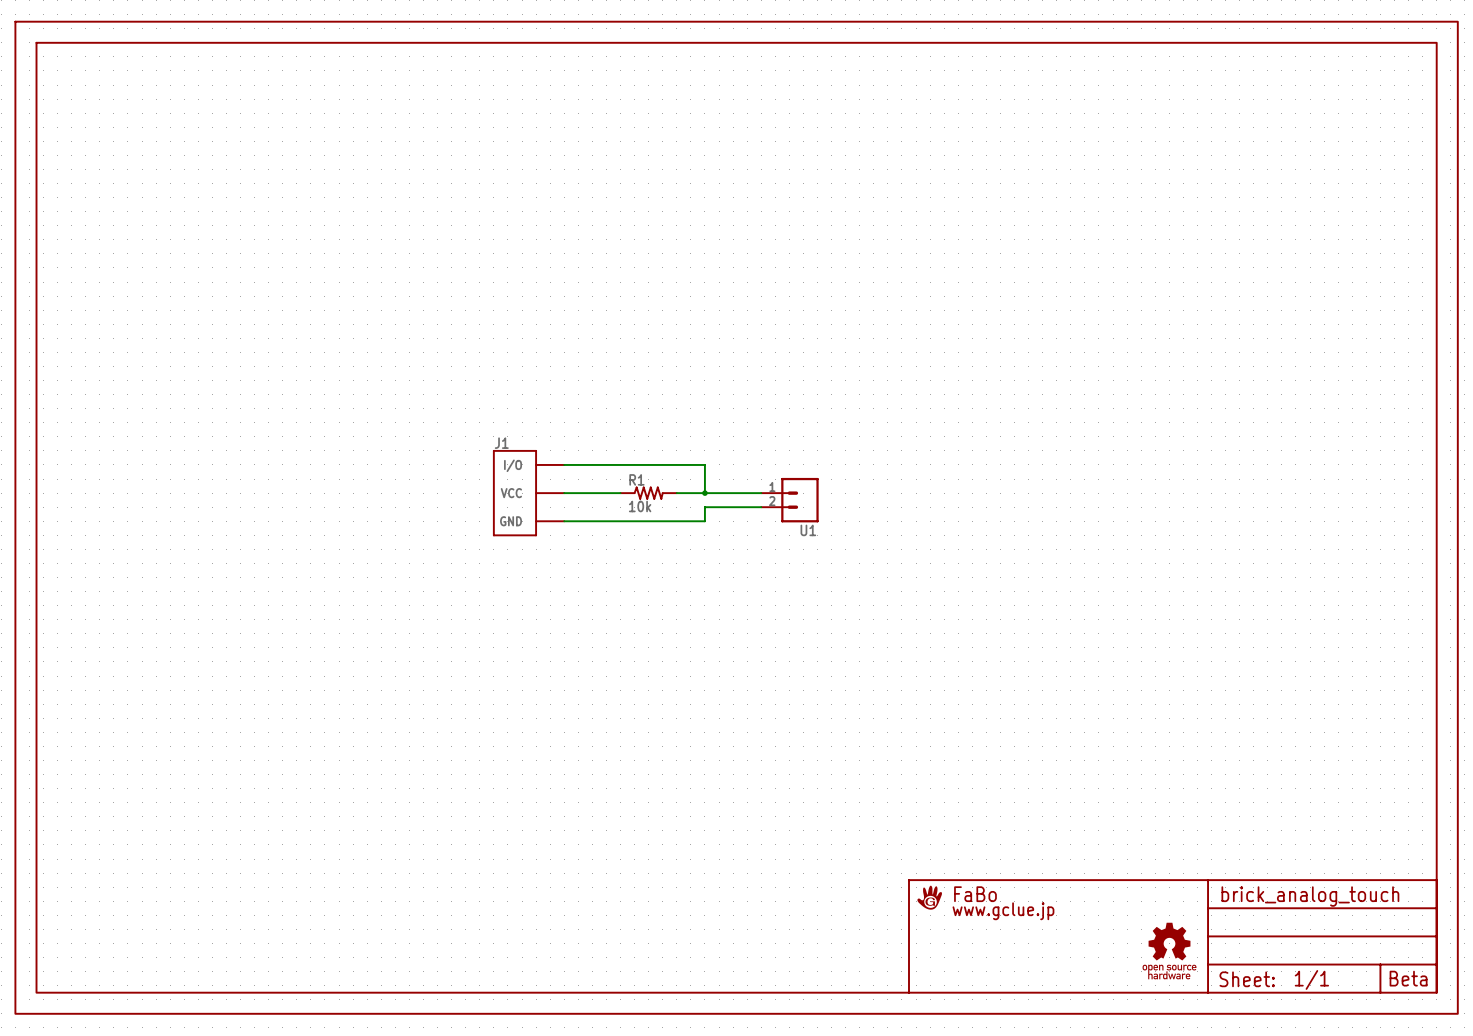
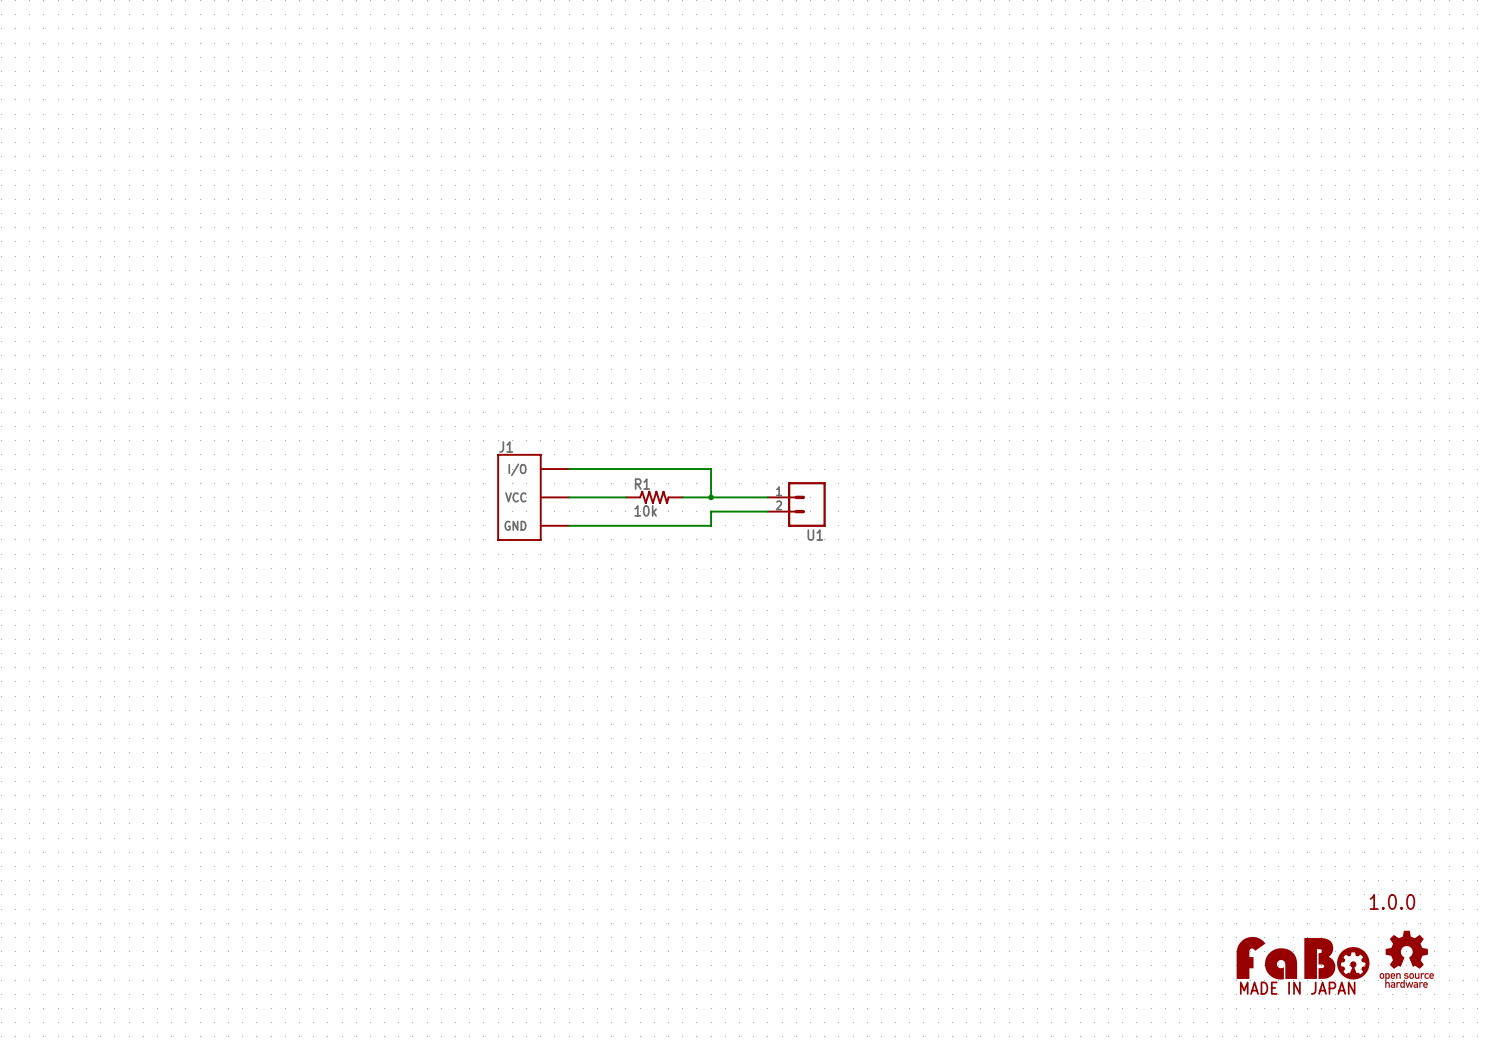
part: (736, 517) -> none
text: none -> 1.0.0 (1392, 901)
part: none -> (1303, 958)
part: (1169, 951) -> none
part: none -> (1406, 959)
text: Beta (1408, 978) -> none

